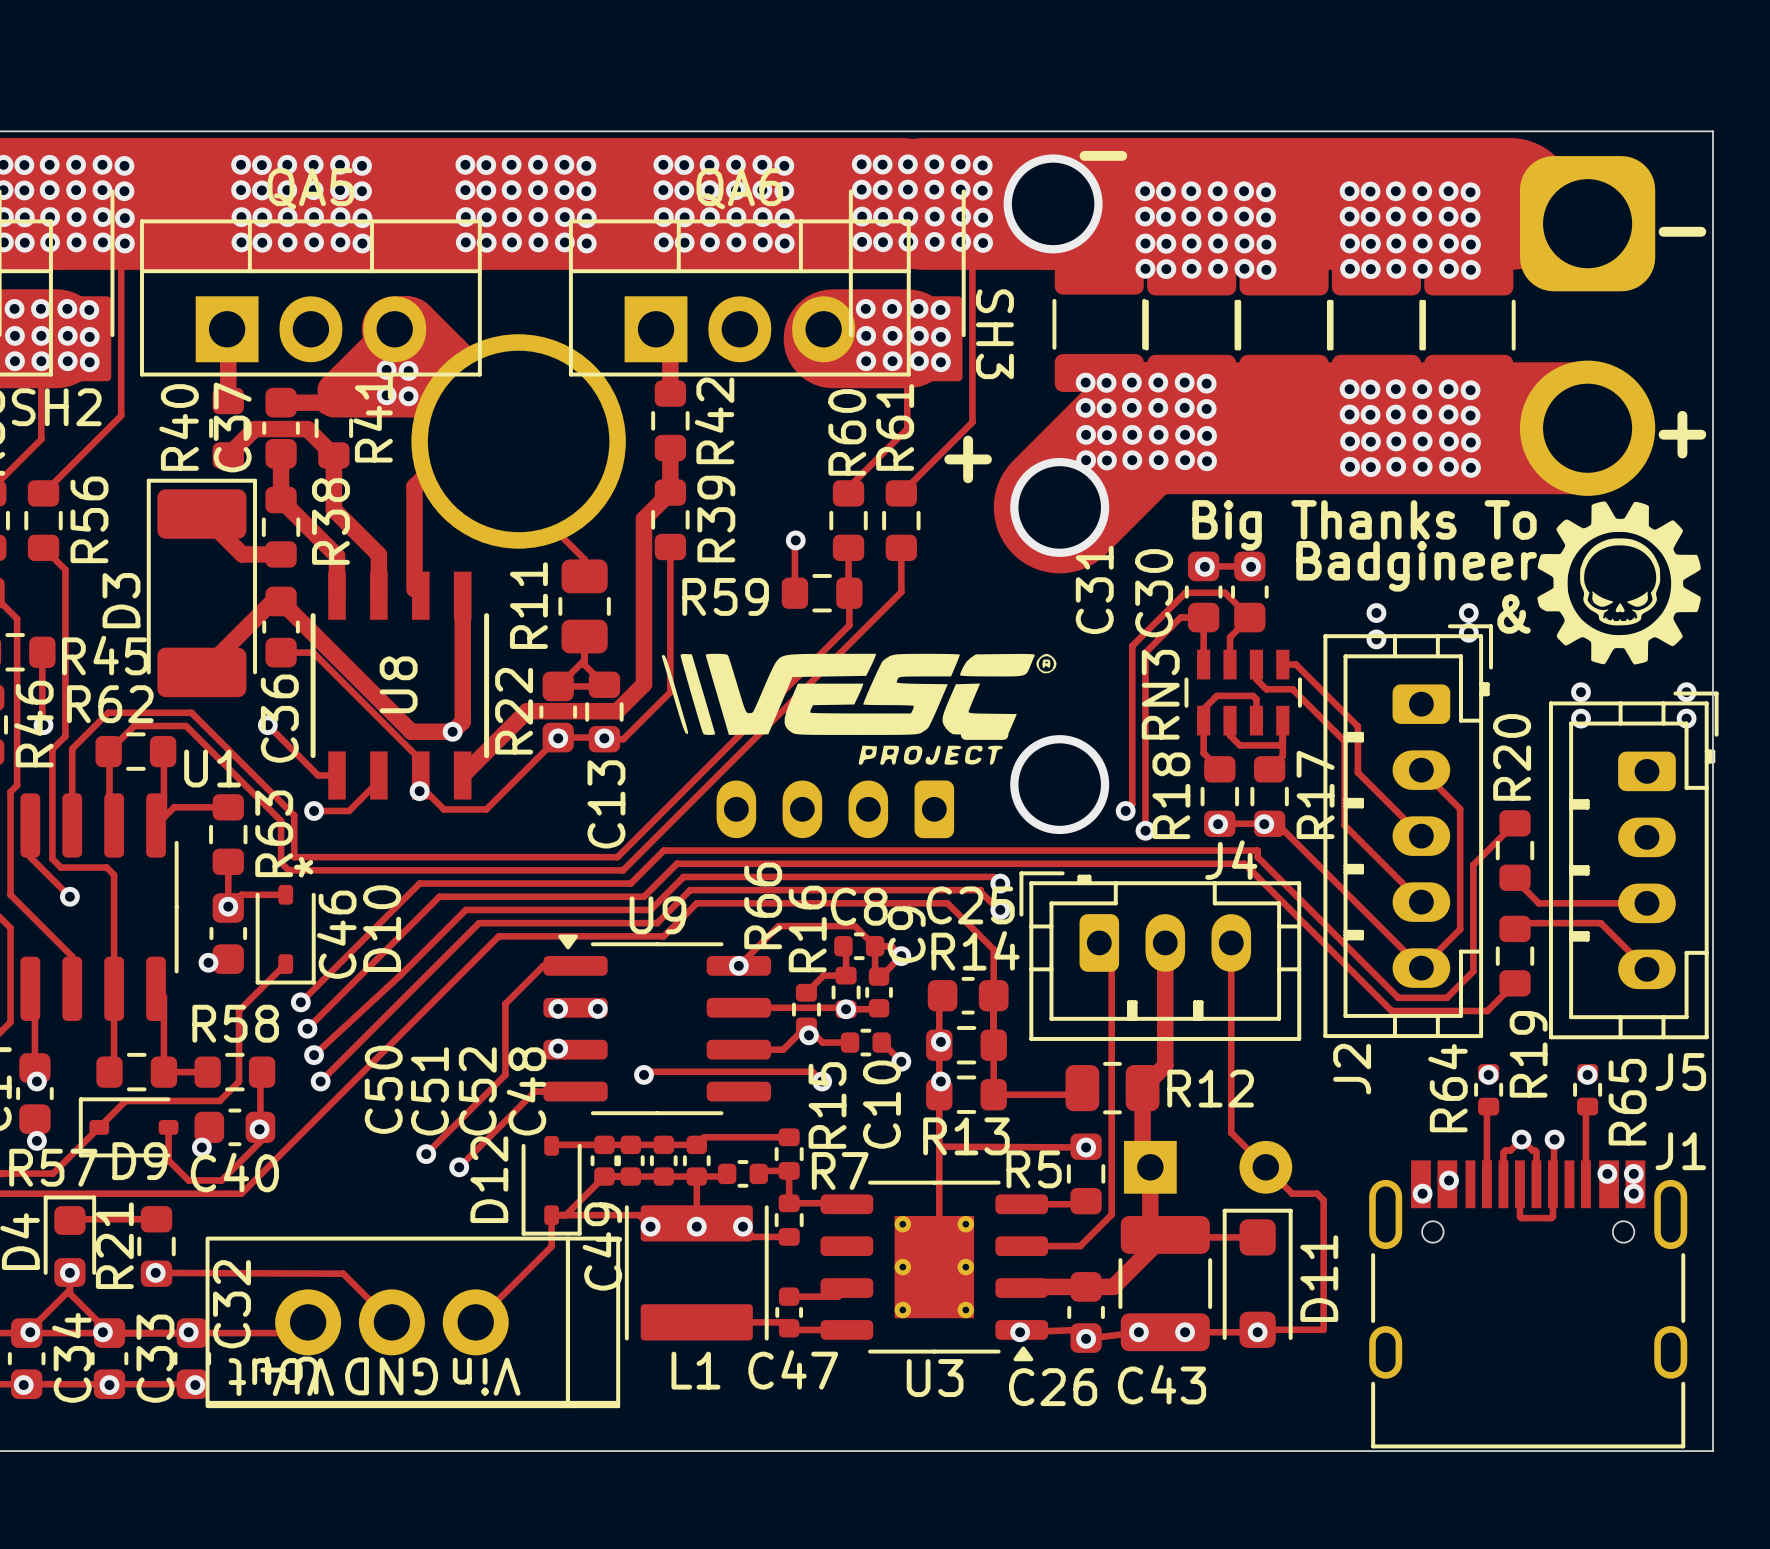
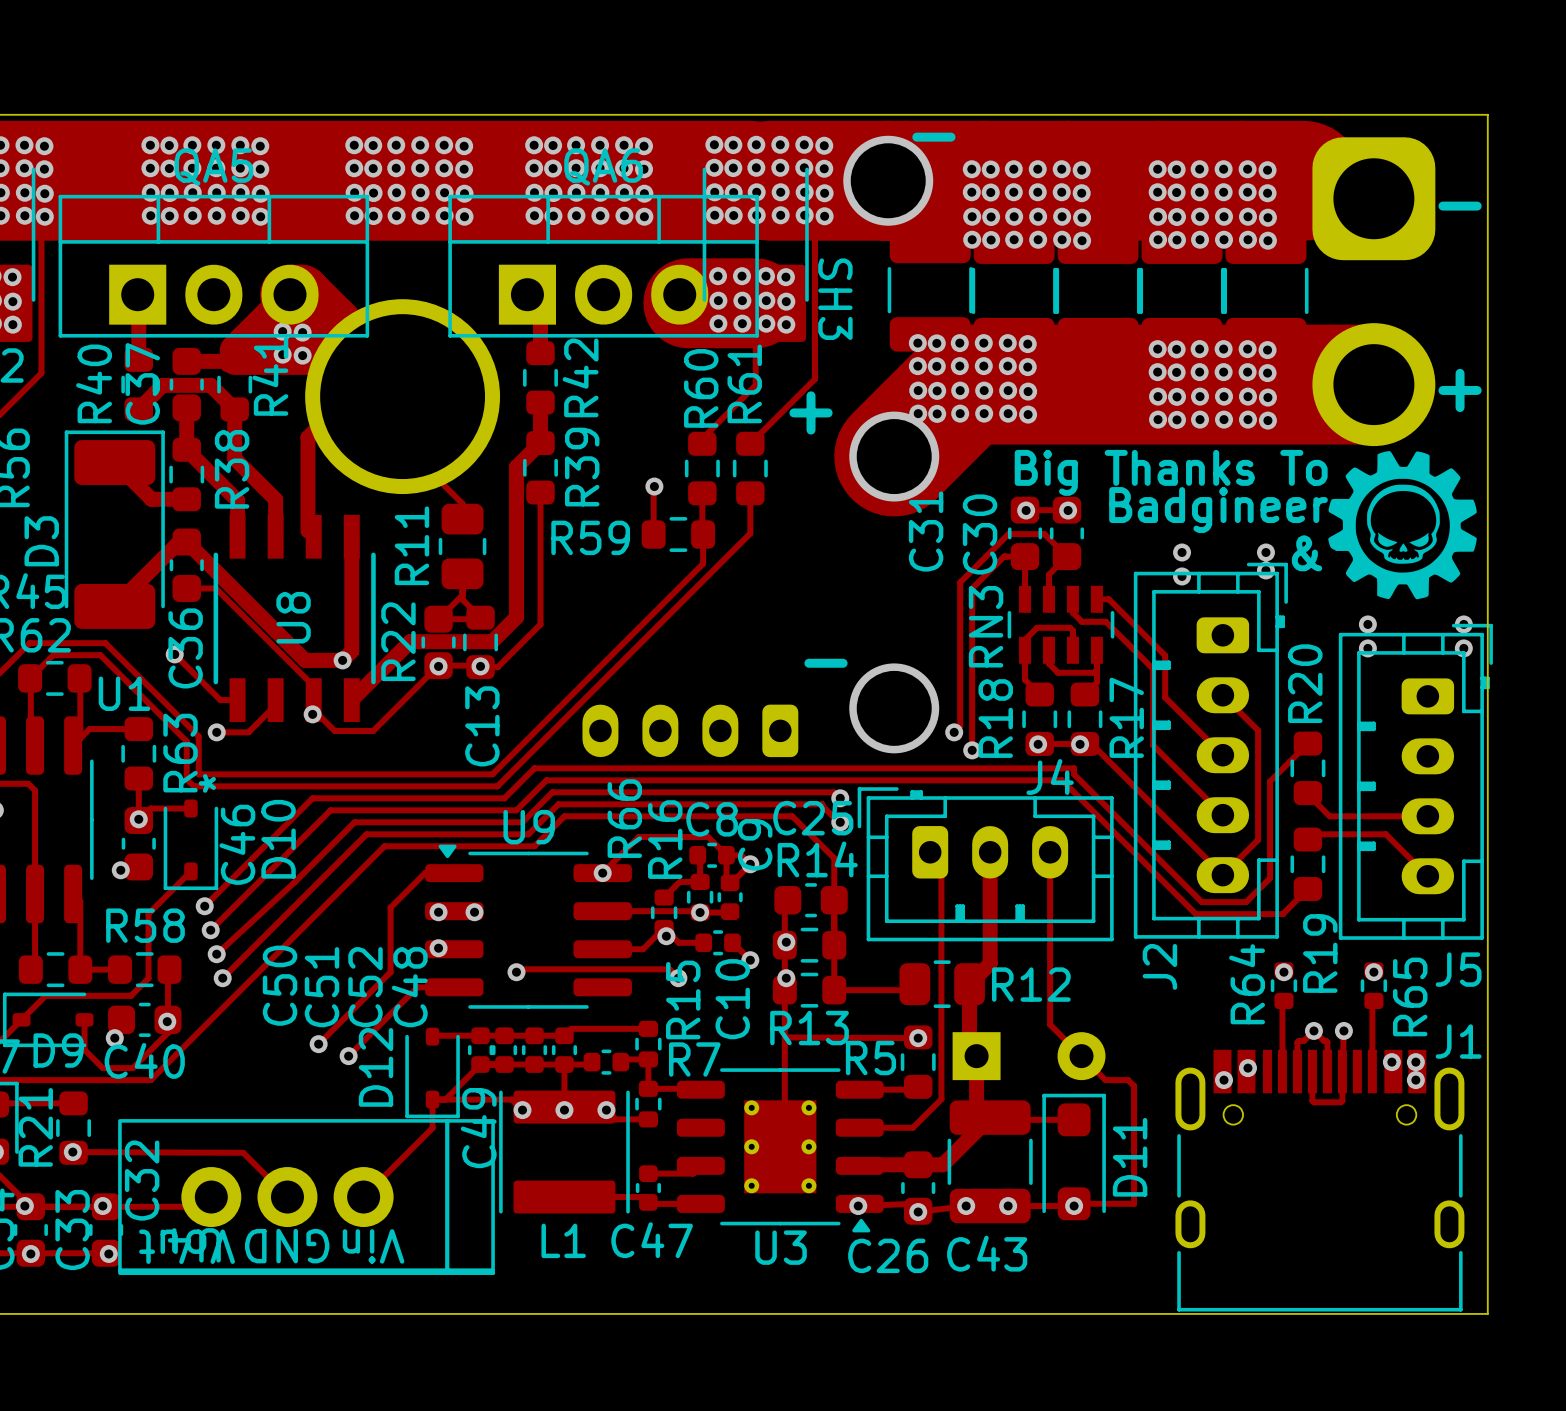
drawing: [661, 653, 1057, 765] -> none

